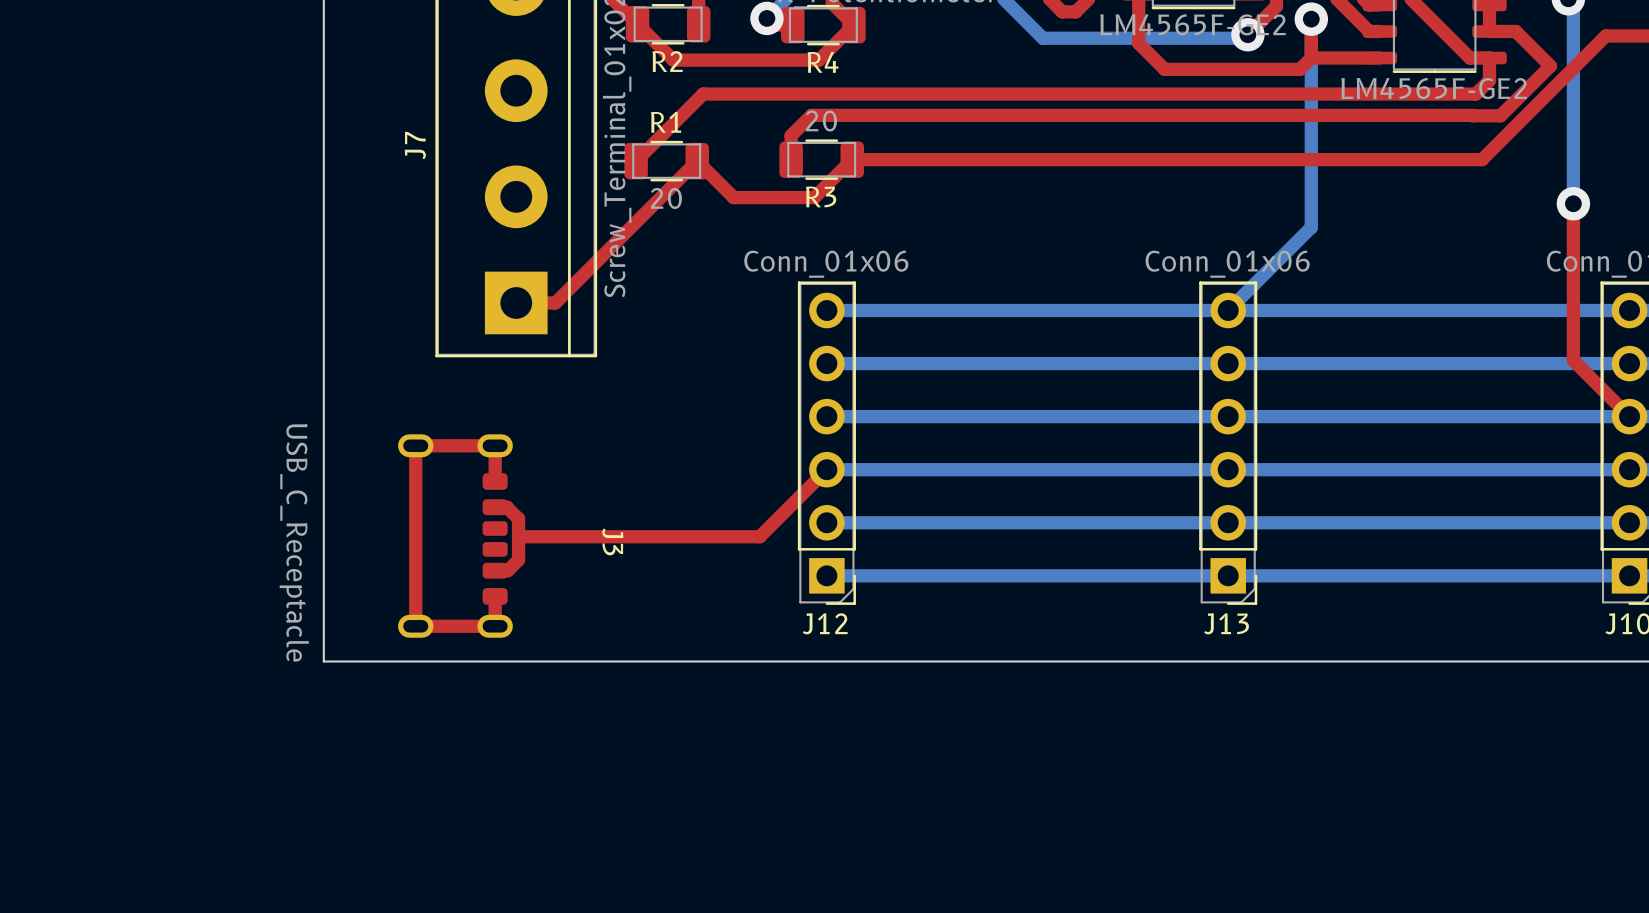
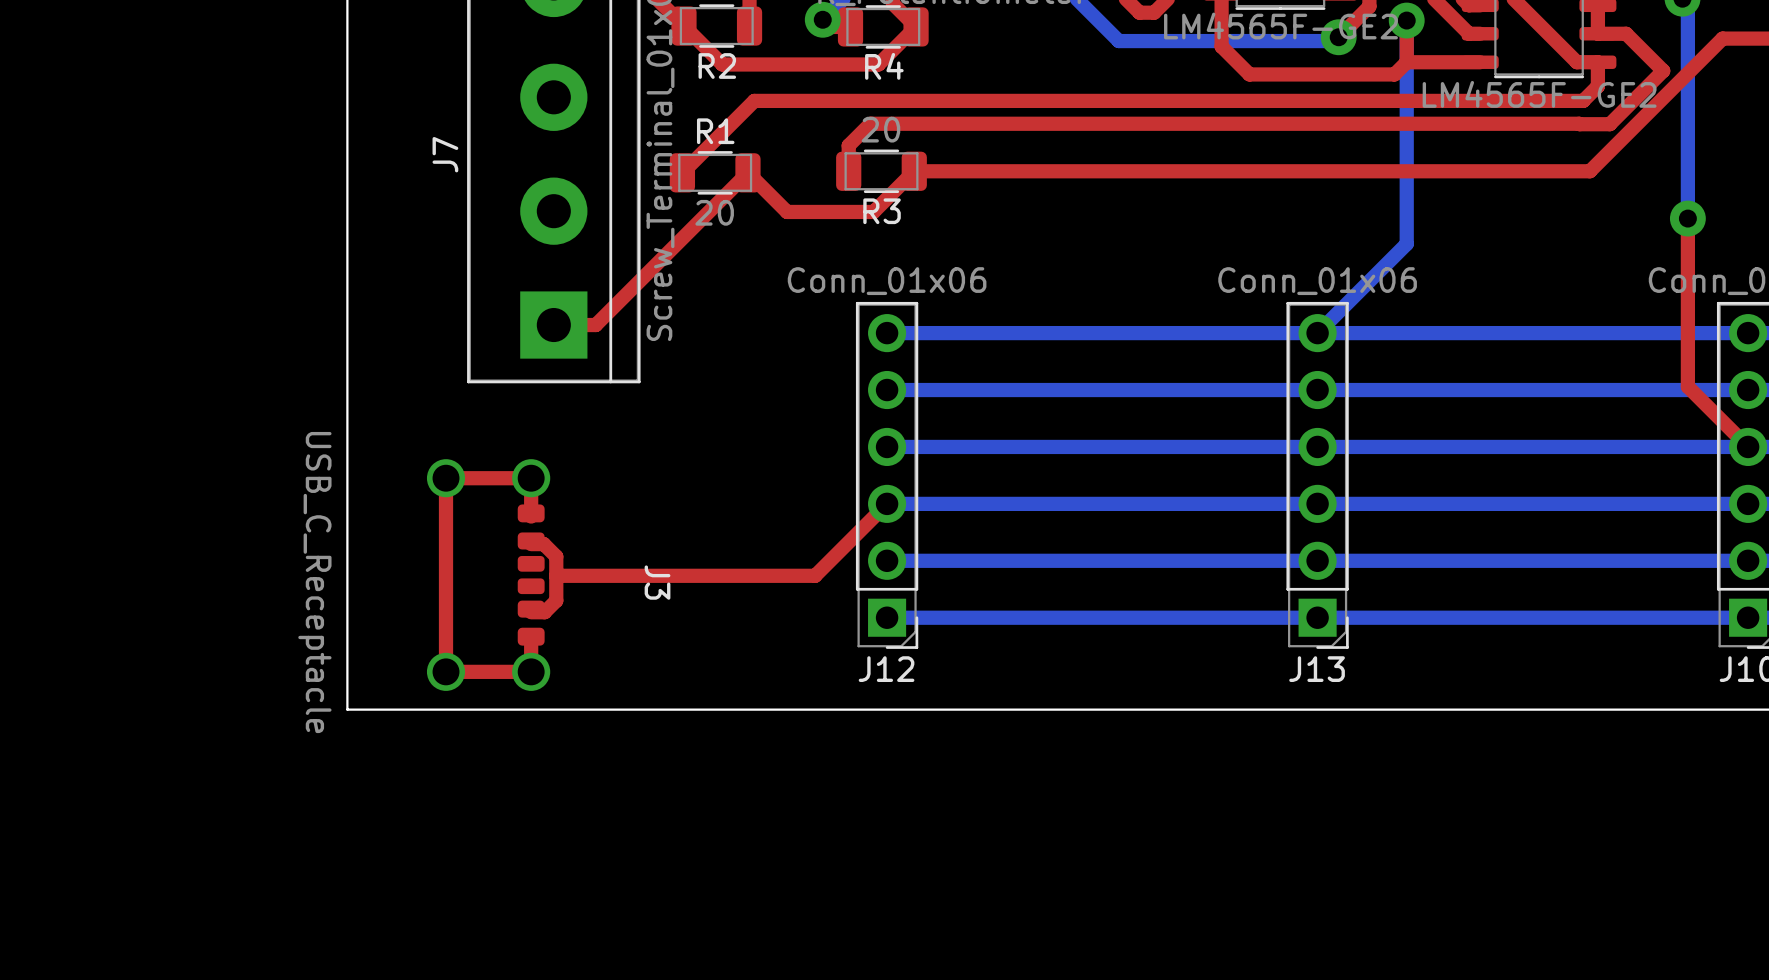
J3 footprint: [397, 434, 513, 638] -> [426, 459, 551, 691]

